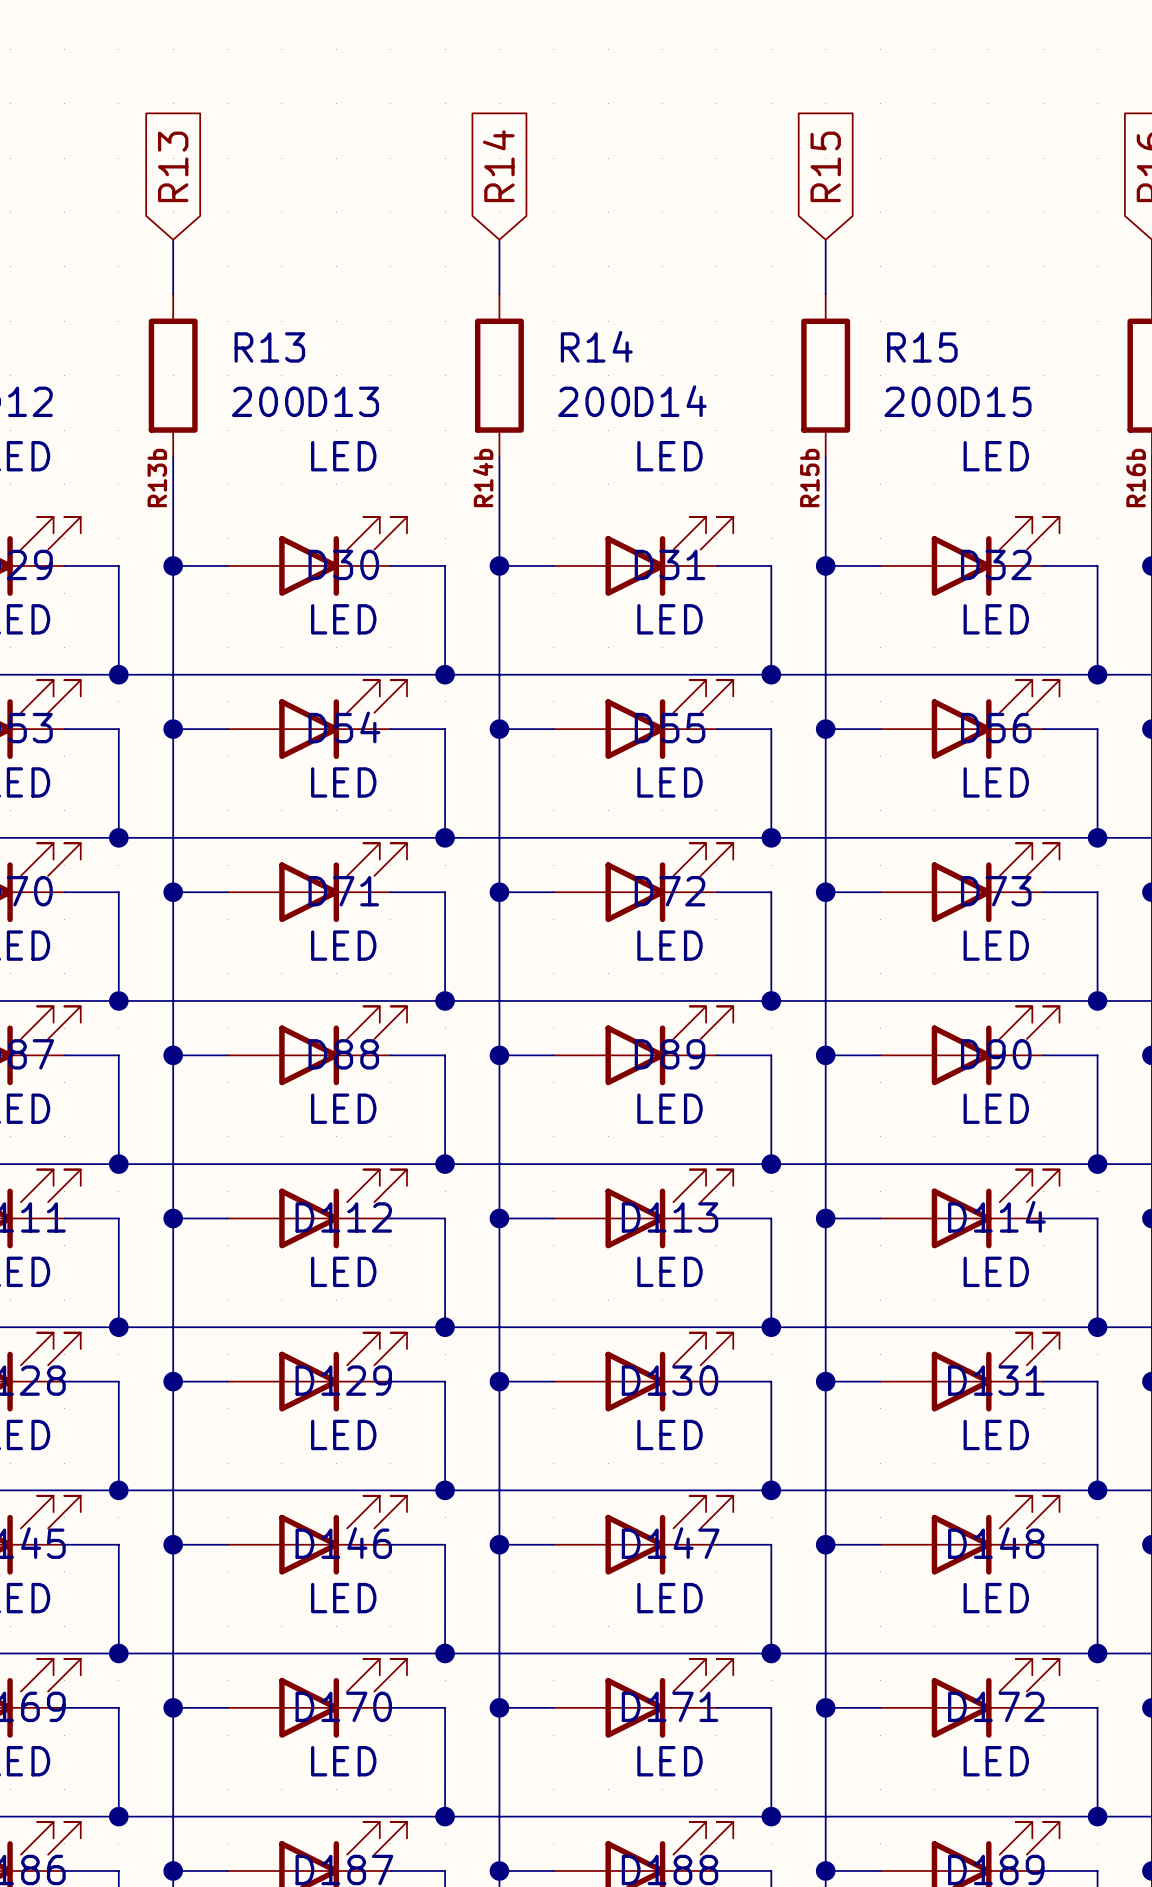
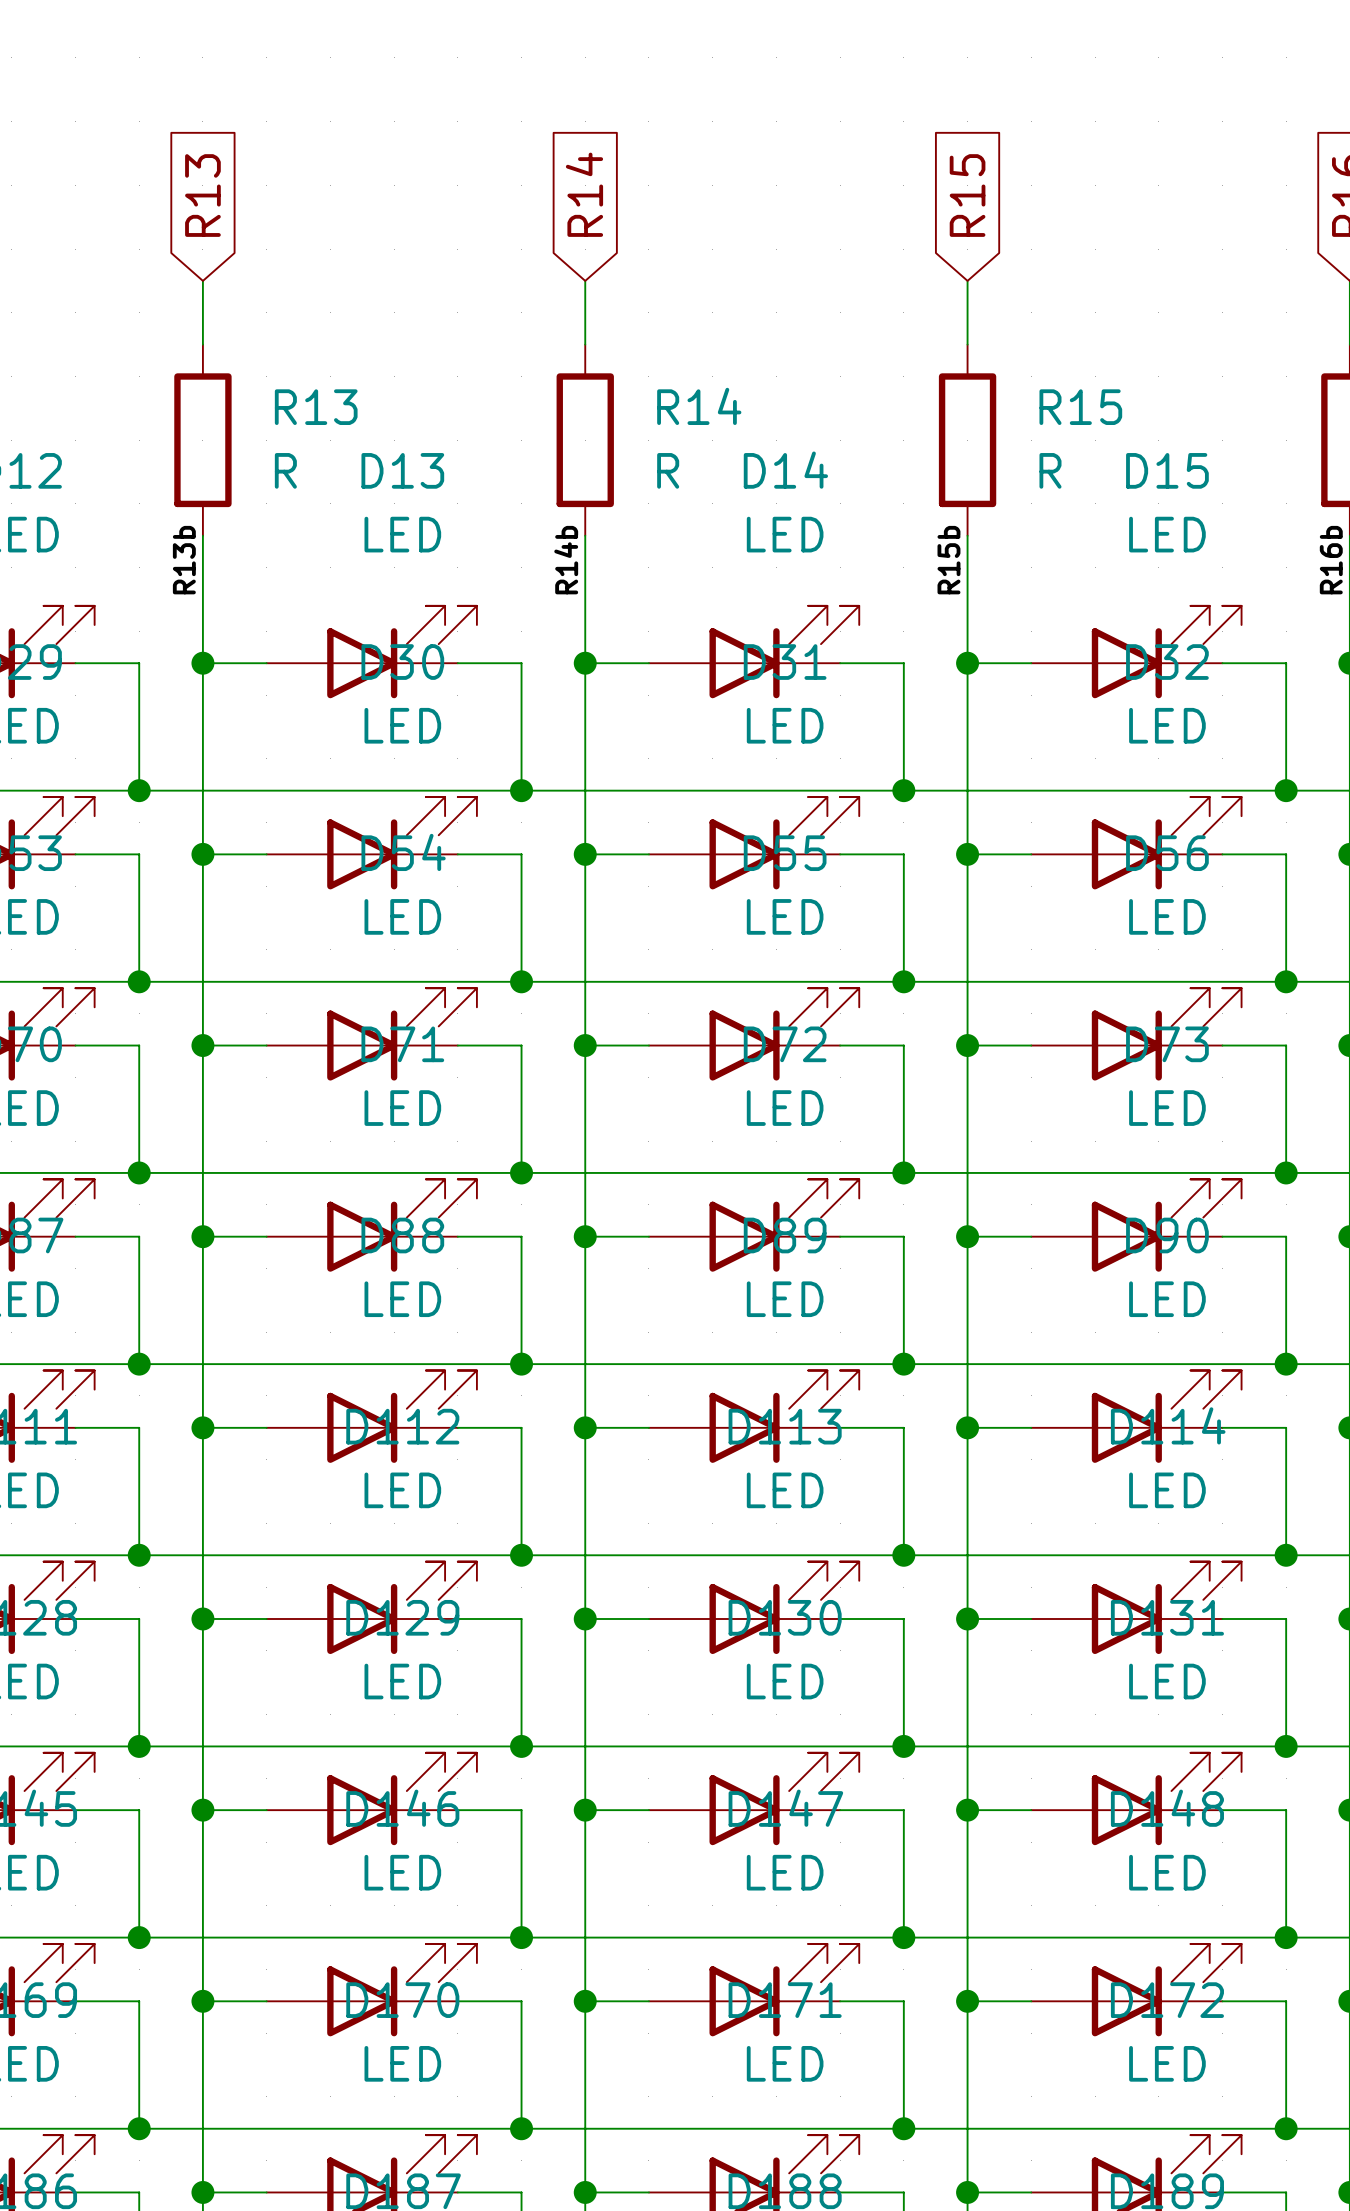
R13 value: 200 (267, 401) -> R (285, 470)
R14 value: 200 (594, 401) -> R (668, 470)
R15 value: 200 (920, 401) -> R (1050, 470)

